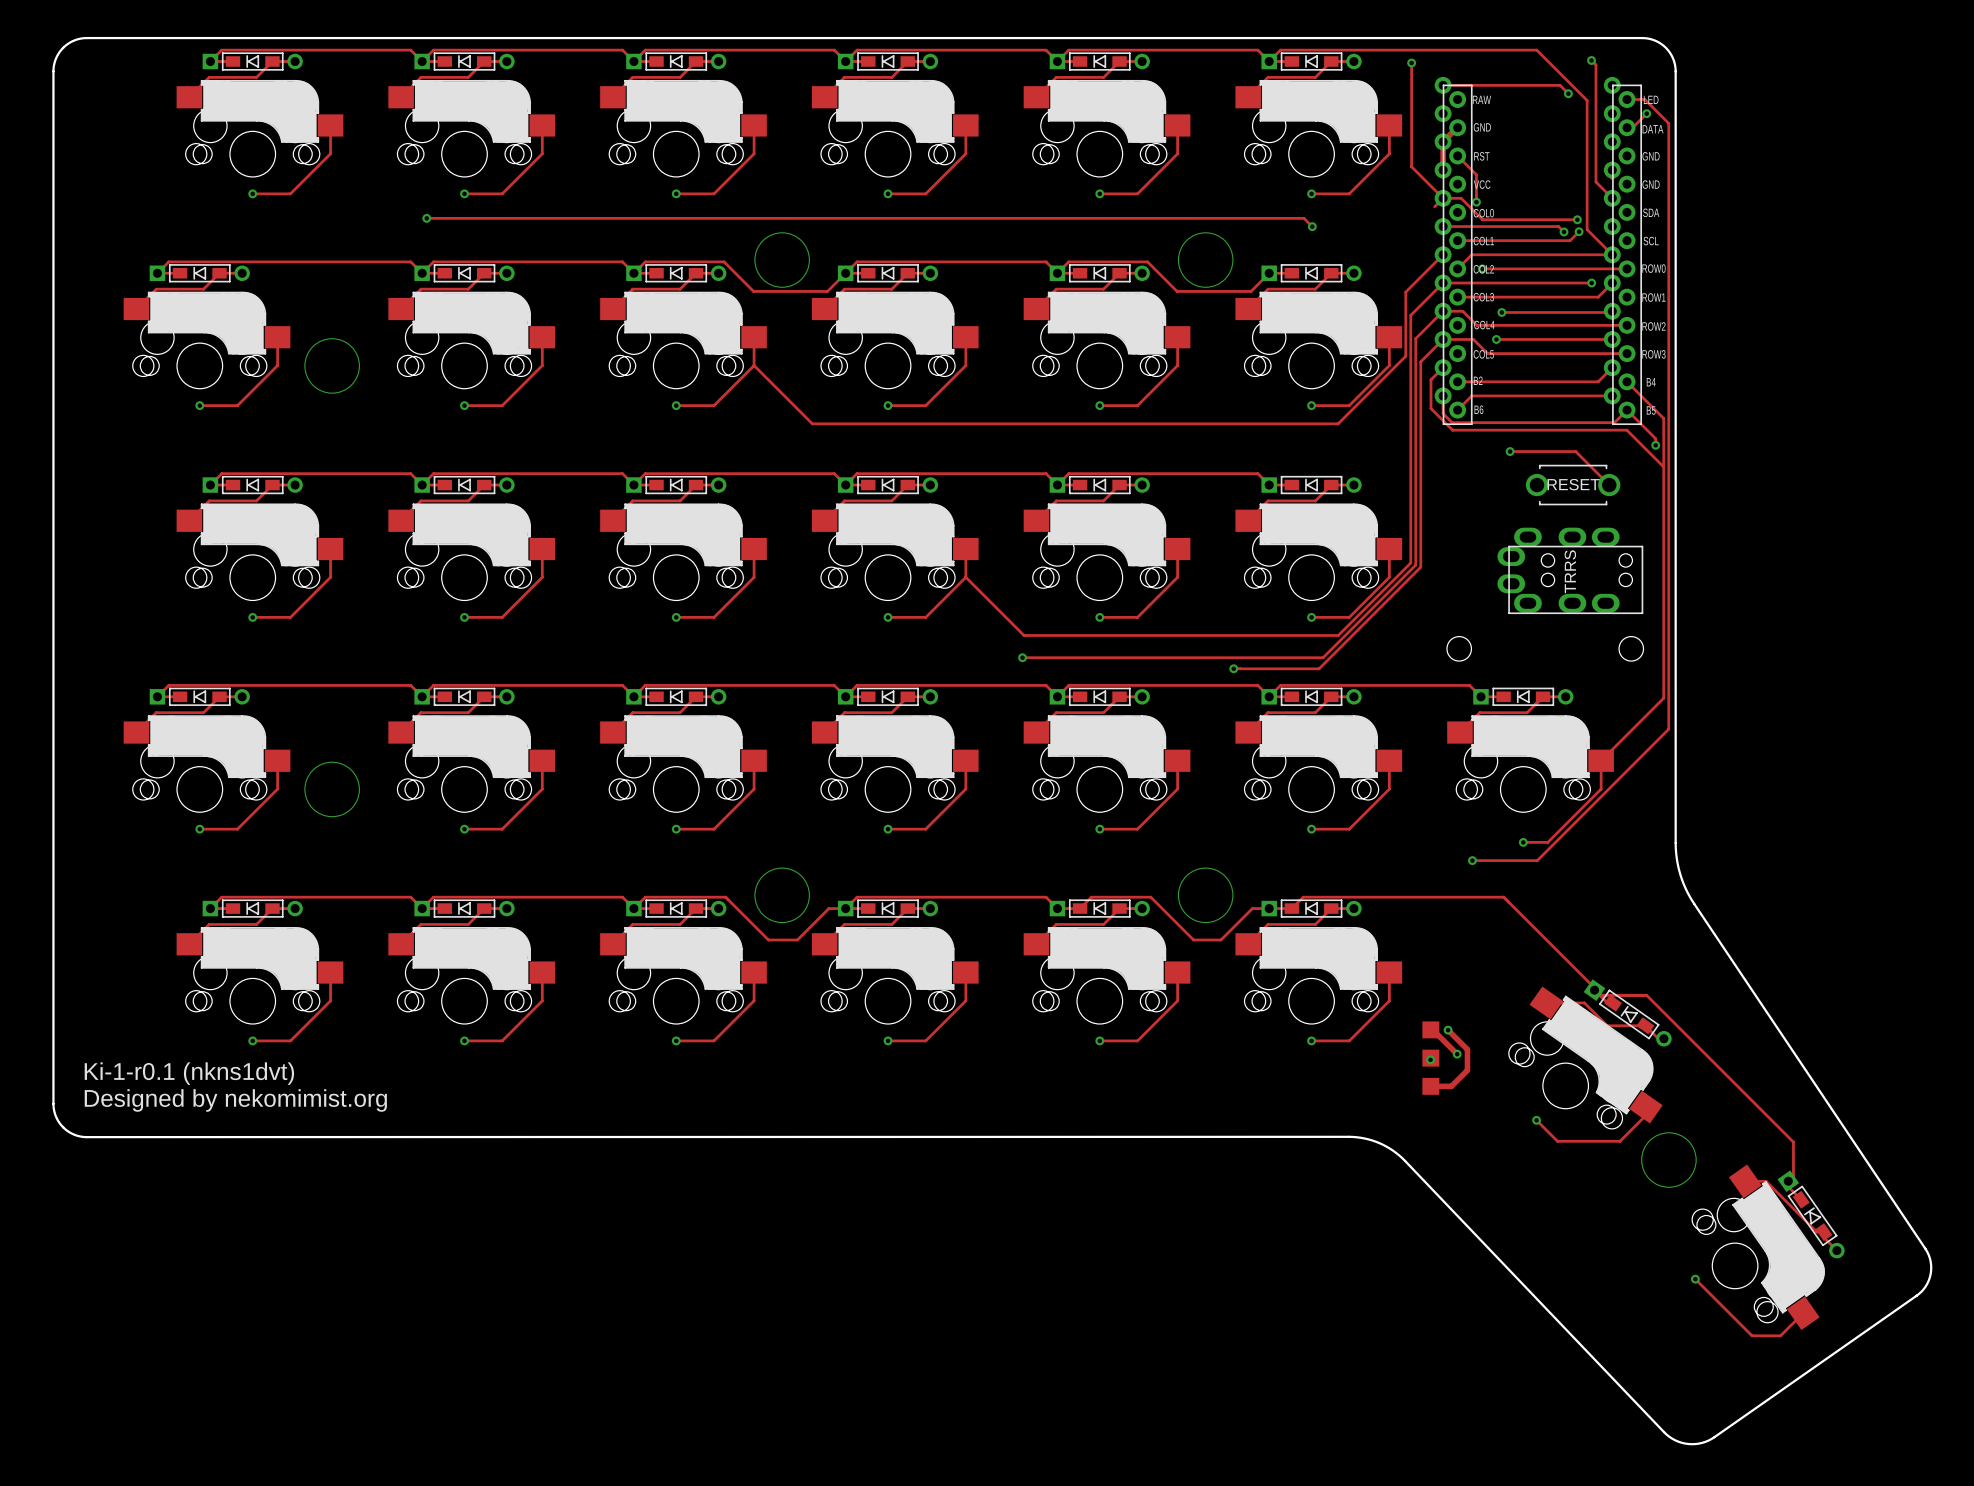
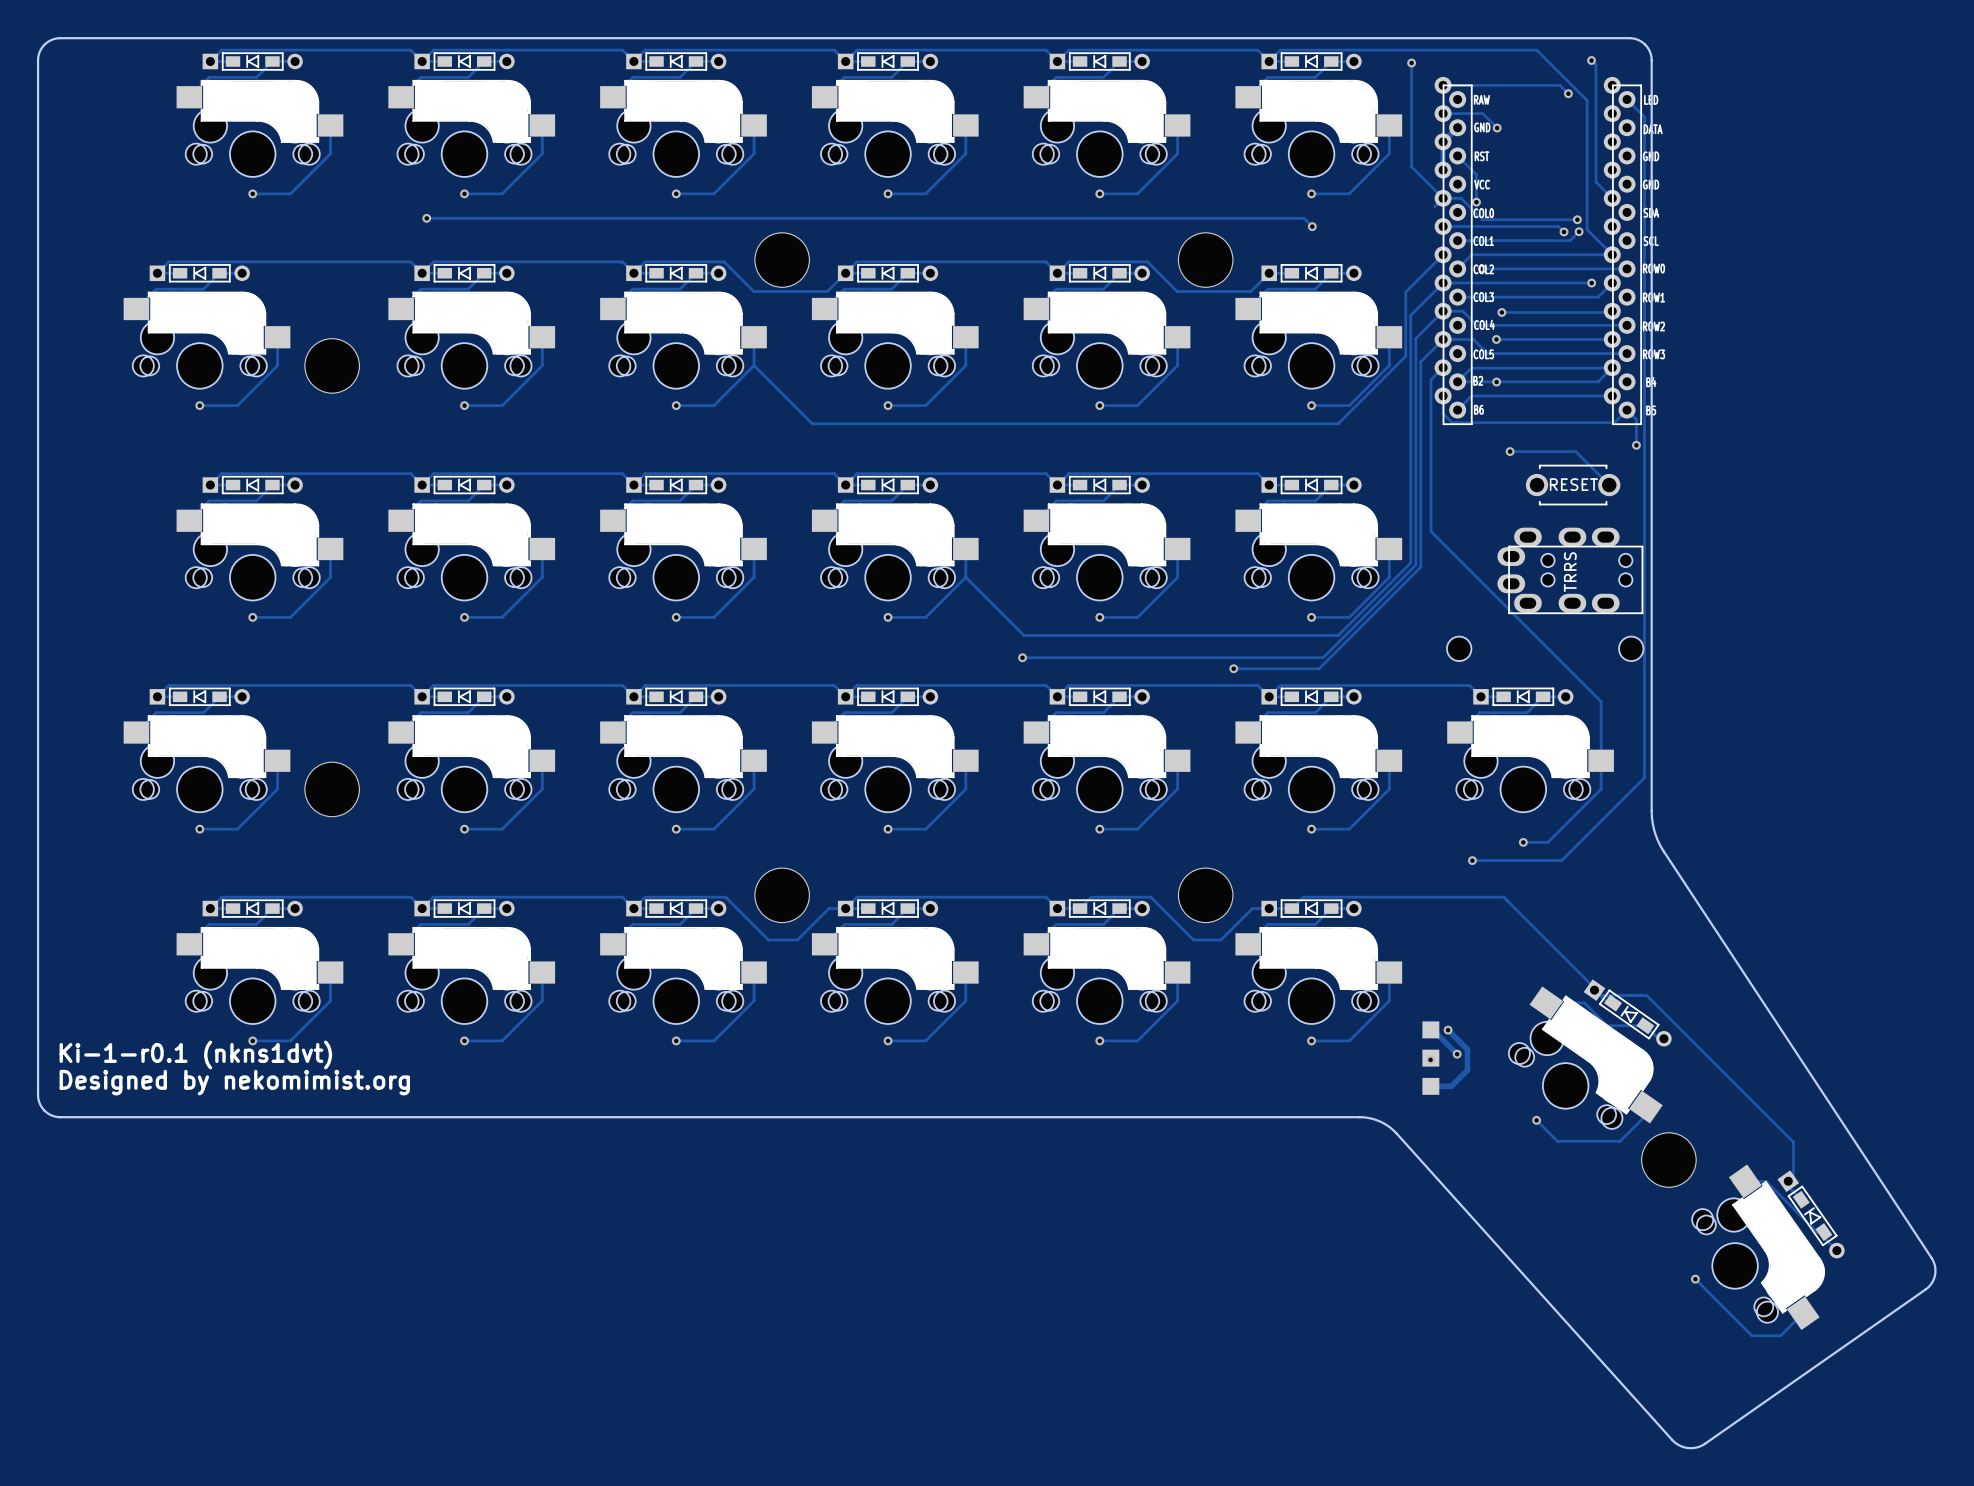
track: (1627, 99) (1644, 99) (1668, 123) (1668, 729) (1537, 860) -> (1627, 99) (1644, 116) (1644, 777) (1561, 860) (1537, 860)
track: none -> (1443, 113) (1482, 113) (1497, 128)
track: (1646, 113) (1632, 127) (1627, 127) -> none
via: (1646, 113) -> none
via: none -> (1497, 128)
track: none -> (1611, 368) (1471, 368) (1457, 381)
track: (1430, 379) (1430, 408) (1452, 430) (1626, 430) (1663, 467) -> none
track: (1627, 381) (1663, 418) (1663, 698) (1601, 760) -> (1431, 379) (1431, 531) (1601, 701) (1601, 760)
via: none -> (1496, 382)
track: (1627, 410) (1655, 438) (1655, 445) -> (1627, 410) (1636, 419) (1636, 445)
via position: (1655, 445) -> (1636, 445)
text position: Ki-1-r0.1 (nkns1dvt) (189, 1073) -> Ki-1-r0.1 (nkns1dvt) (195, 1054)
text position: Designed by nekomimist.org (235, 1100) -> Designed by nekomimist.org (234, 1082)
board edge: (1916, 1295) (1924, 1288) (1929, 1277) (1931, 1264) (1927, 1251) (1692, 900) (1683, 882) (1677, 863) (1675, 842) (1675, 71) (1671, 55) (1660, 43) (1642, 38) (86, 38) (72, 41) (61, 50) (55, 60) (53, 71) (53, 1103) (56, 1118) (65, 1129) (75, 1135) (86, 1137) (1348, 1136) (1364, 1138) (1386, 1146) (1402, 1158) (1666, 1434) (1678, 1441) (1691, 1444) (1705, 1441) (1714, 1437) -> (1916, 1295) (1927, 1288) (1932, 1281) (1935, 1270) (1932, 1260) (1663, 851) (1653, 826) (1651, 810) (1651, 60) (1649, 49) (1641, 41) (1629, 38) (60, 38) (51, 39) (43, 46) (38, 60) (38, 1094) (40, 1104) (46, 1112) (60, 1117) (1370, 1118) (1384, 1123) (1396, 1133) (1673, 1441) (1681, 1446) (1692, 1448) (1701, 1445) (1714, 1437)

